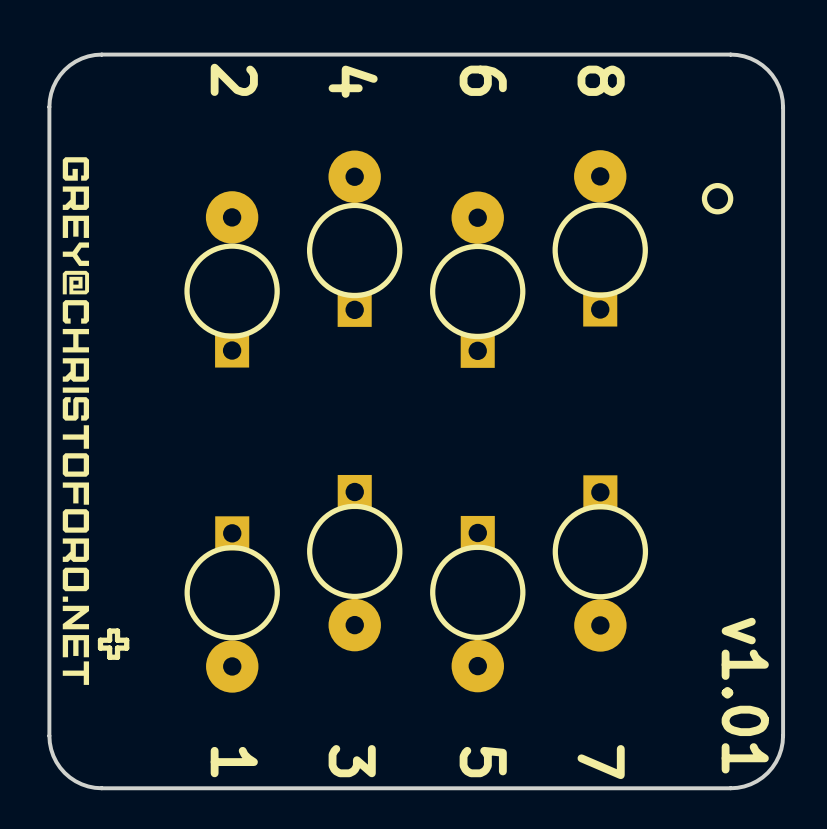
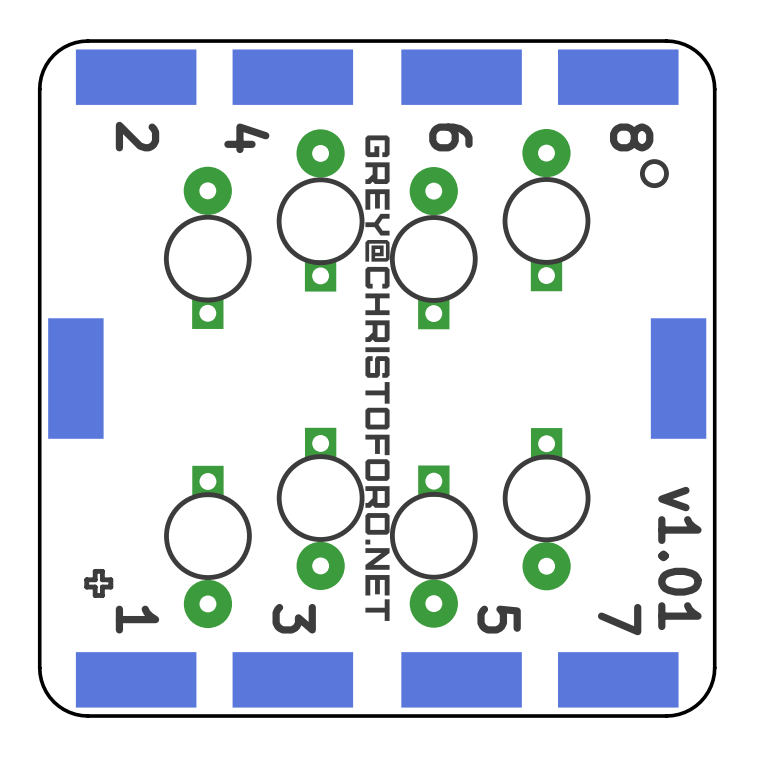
text position: 2 (234, 79) -> 2 (137, 136)
text position: 6 (483, 80) -> 6 (450, 137)
text position: 8 (601, 80) -> 8 (631, 137)
text position: 4 (353, 81) -> 4 (246, 138)
part: none -> (136, 77)
part: none -> (292, 77)
part: none -> (461, 77)
part: none -> (618, 77)
drawing position: (75, 421) -> (377, 378)
part: none -> (75, 378)
part: none -> (678, 378)
text position: v1.01 (745, 695) -> v1.01 (679, 558)
part: none -> (136, 679)
part: none -> (292, 679)
part: none -> (461, 679)
part: none -> (618, 679)
text position: 3 (352, 761) -> 3 (294, 618)
text position: 1 (234, 762) -> 1 (137, 619)
text position: 5 (483, 762) -> 5 (499, 619)
text position: 7 (601, 762) -> 7 (619, 619)

